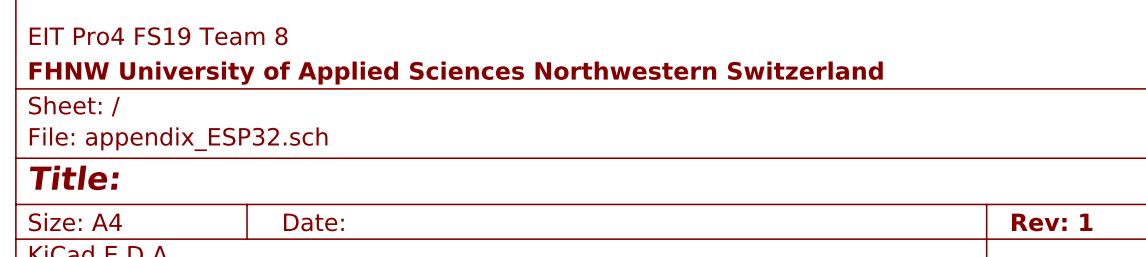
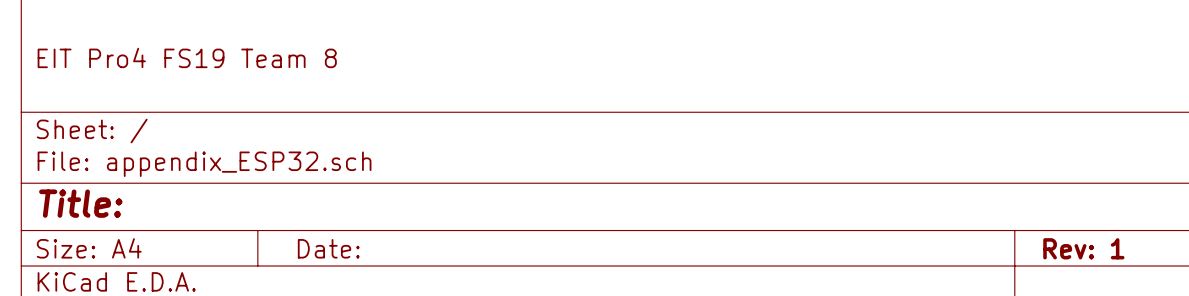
title block: FHNW University of Applied Sciences Northwestern Switzerland (456, 73) -> none

